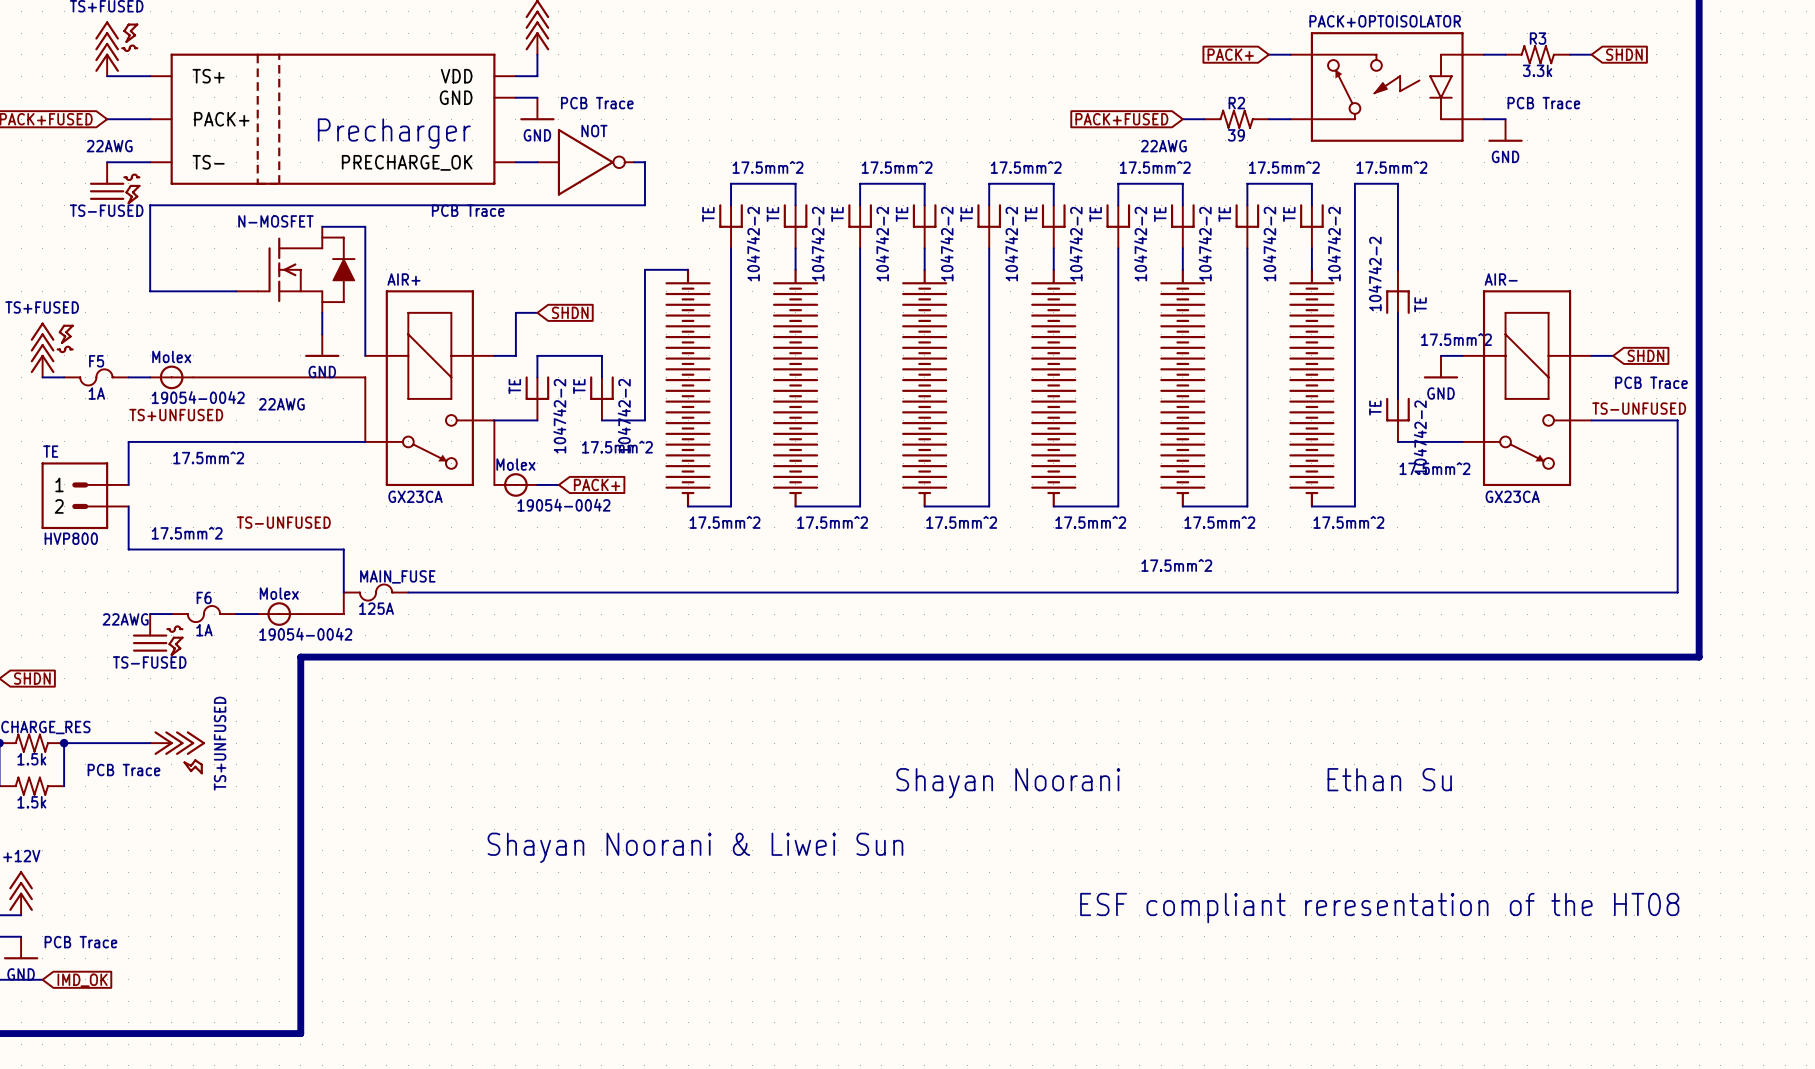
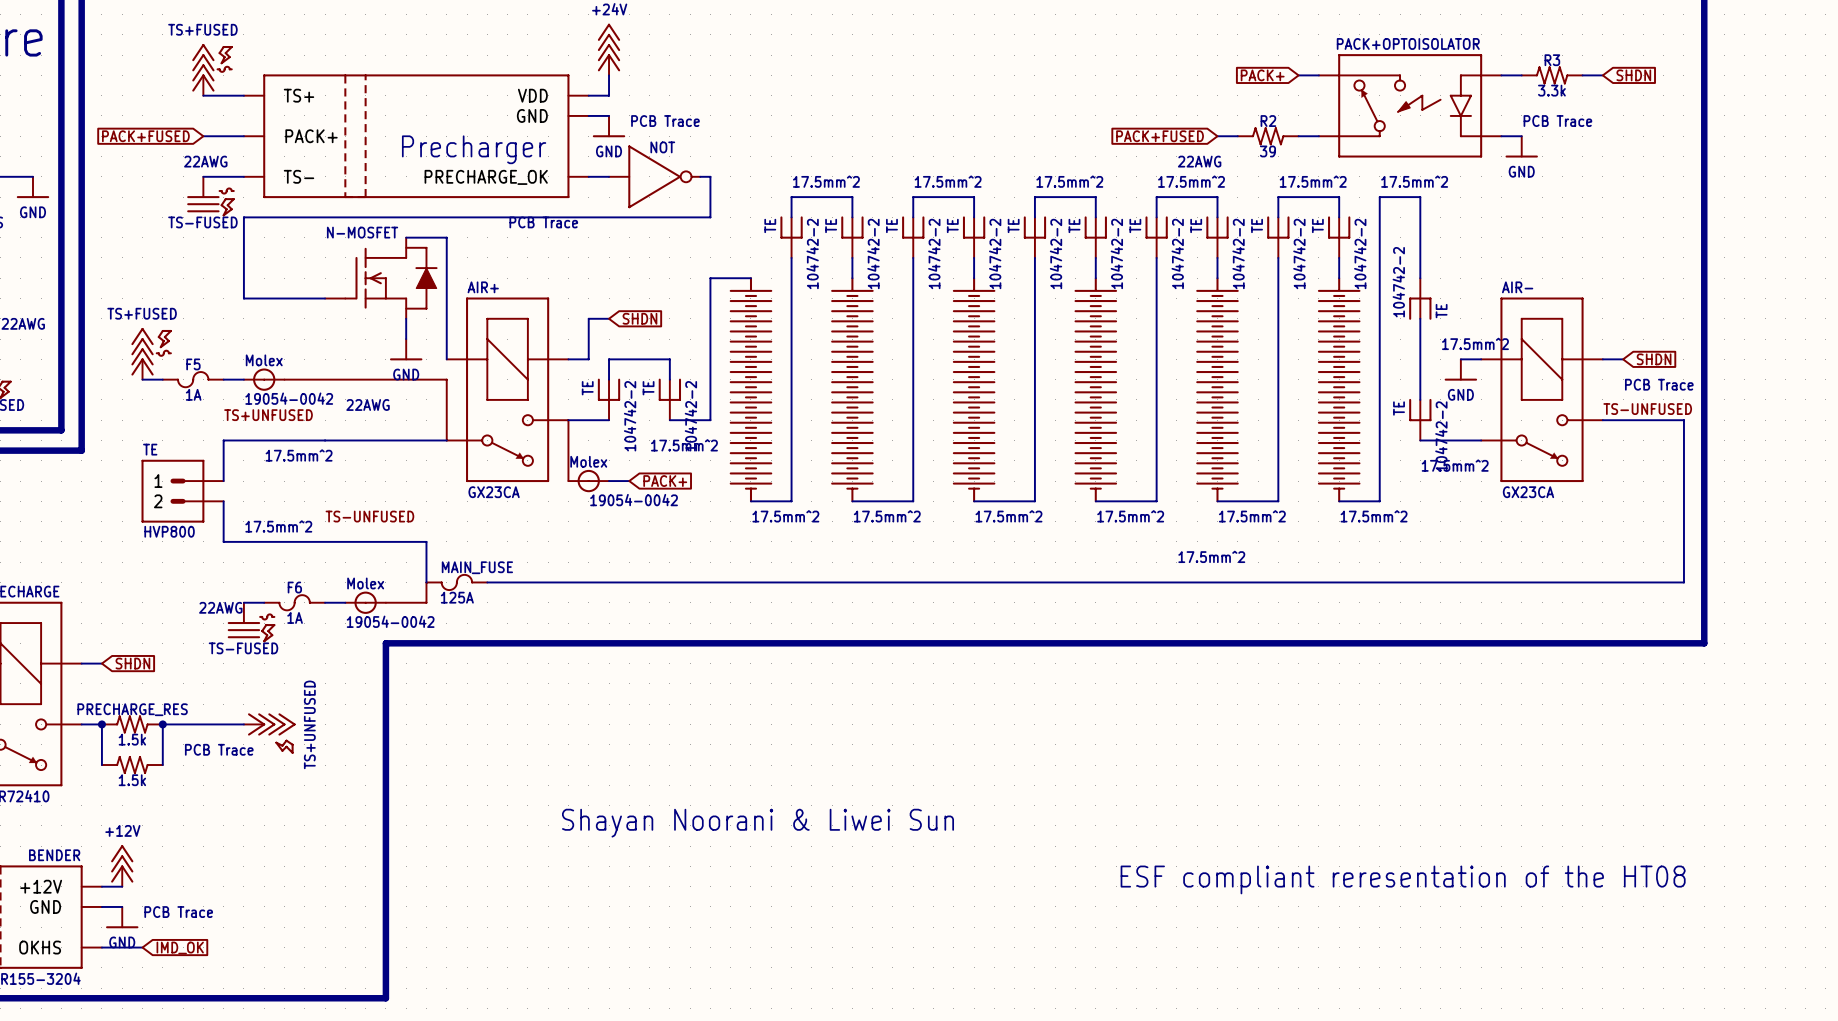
text: Ethan Su (1389, 779) -> none
text: Shayan Noorani (1008, 783) -> none

